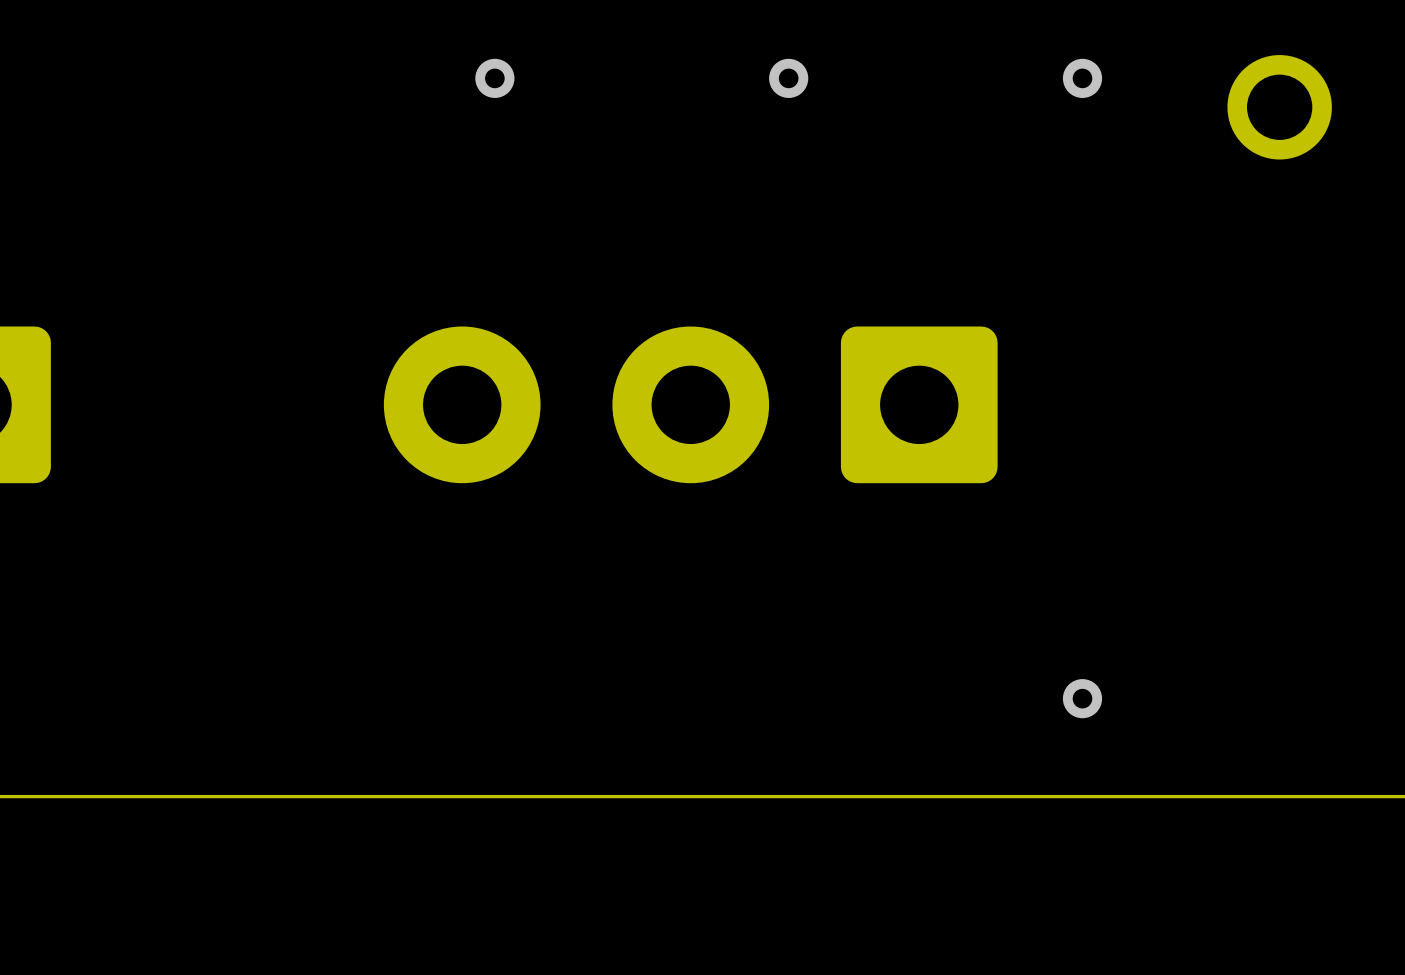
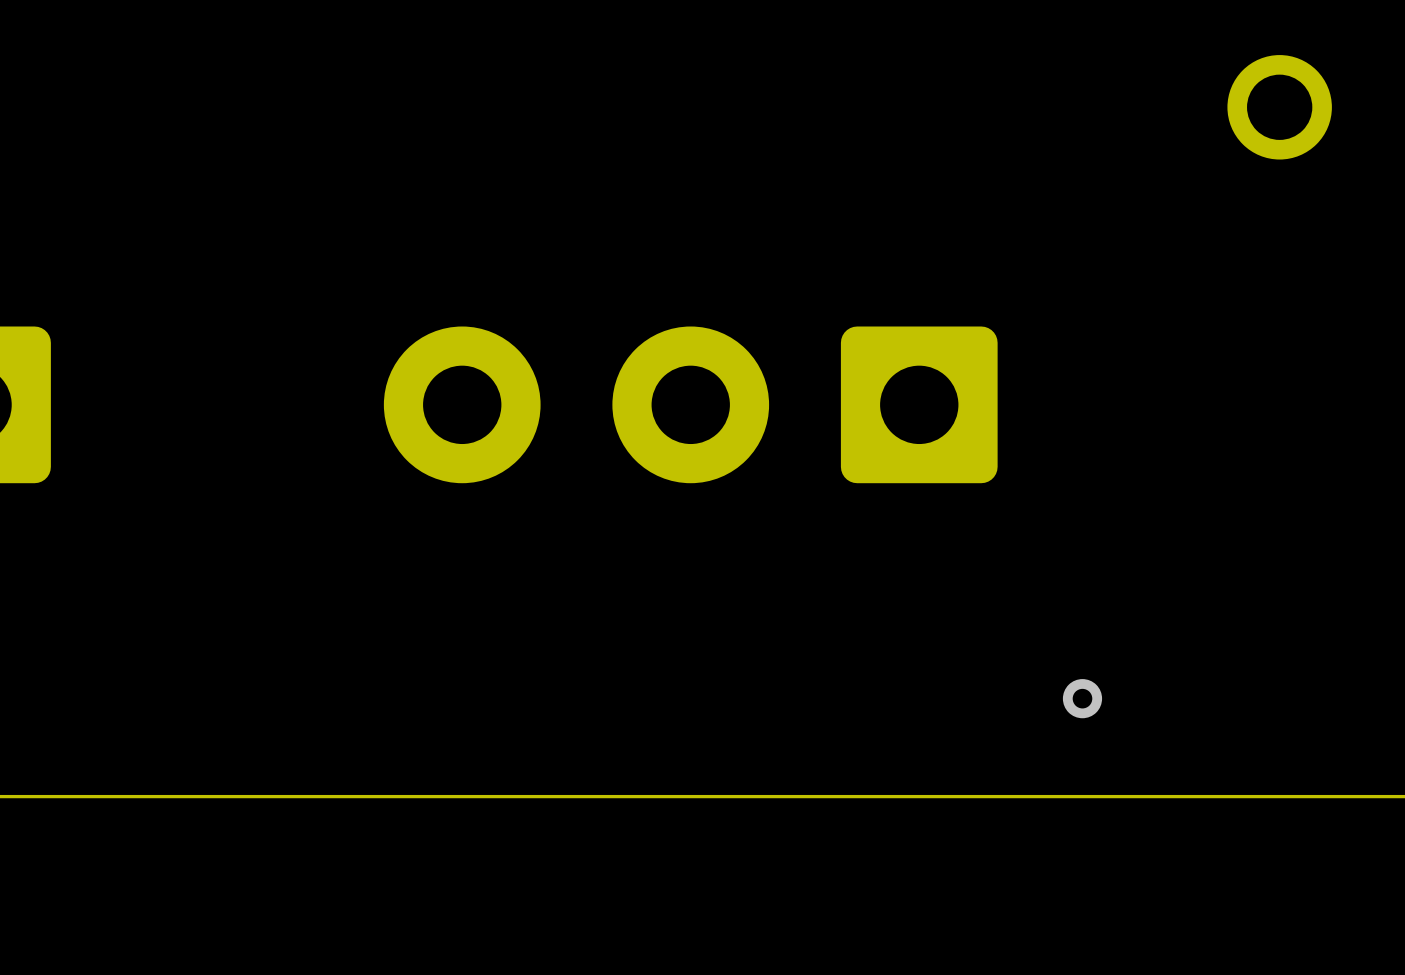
via: (494, 78) -> none
via: (788, 78) -> none
via: (1082, 78) -> none

